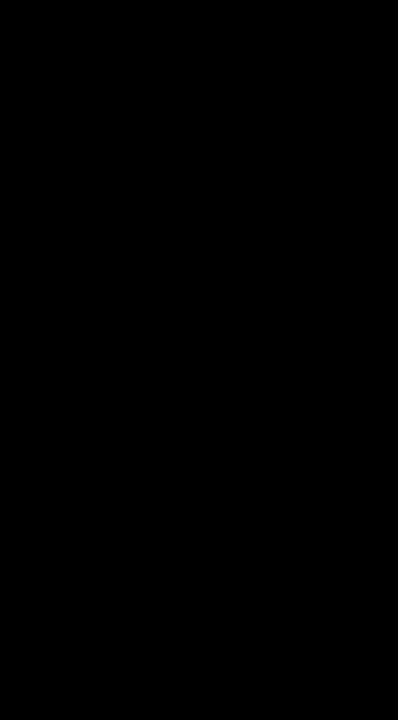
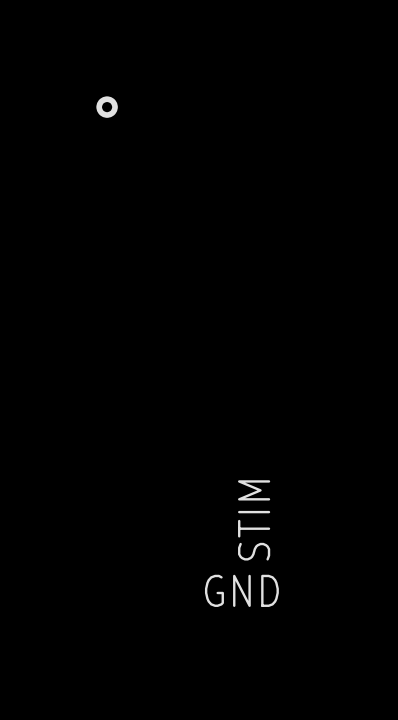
drawing: none -> [96, 96, 118, 118]
text: none -> STIM (254, 520)
text: none -> GND (241, 590)

